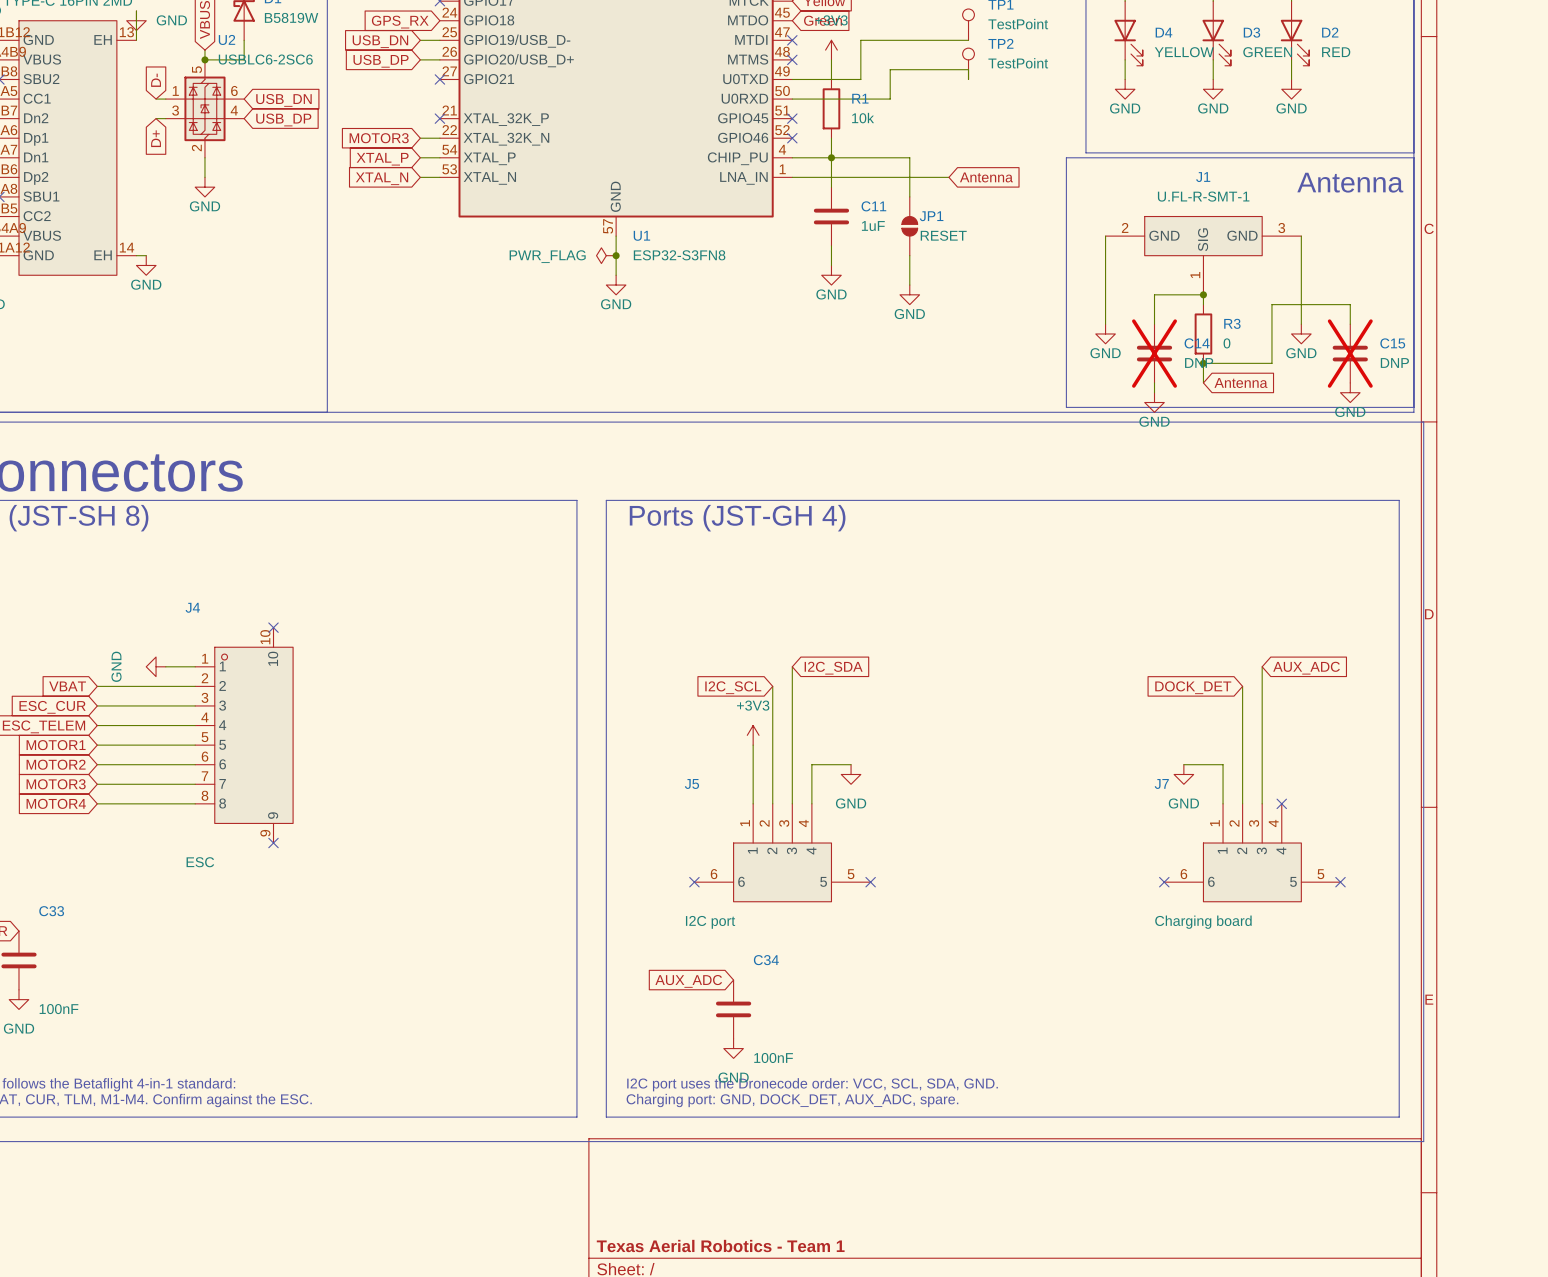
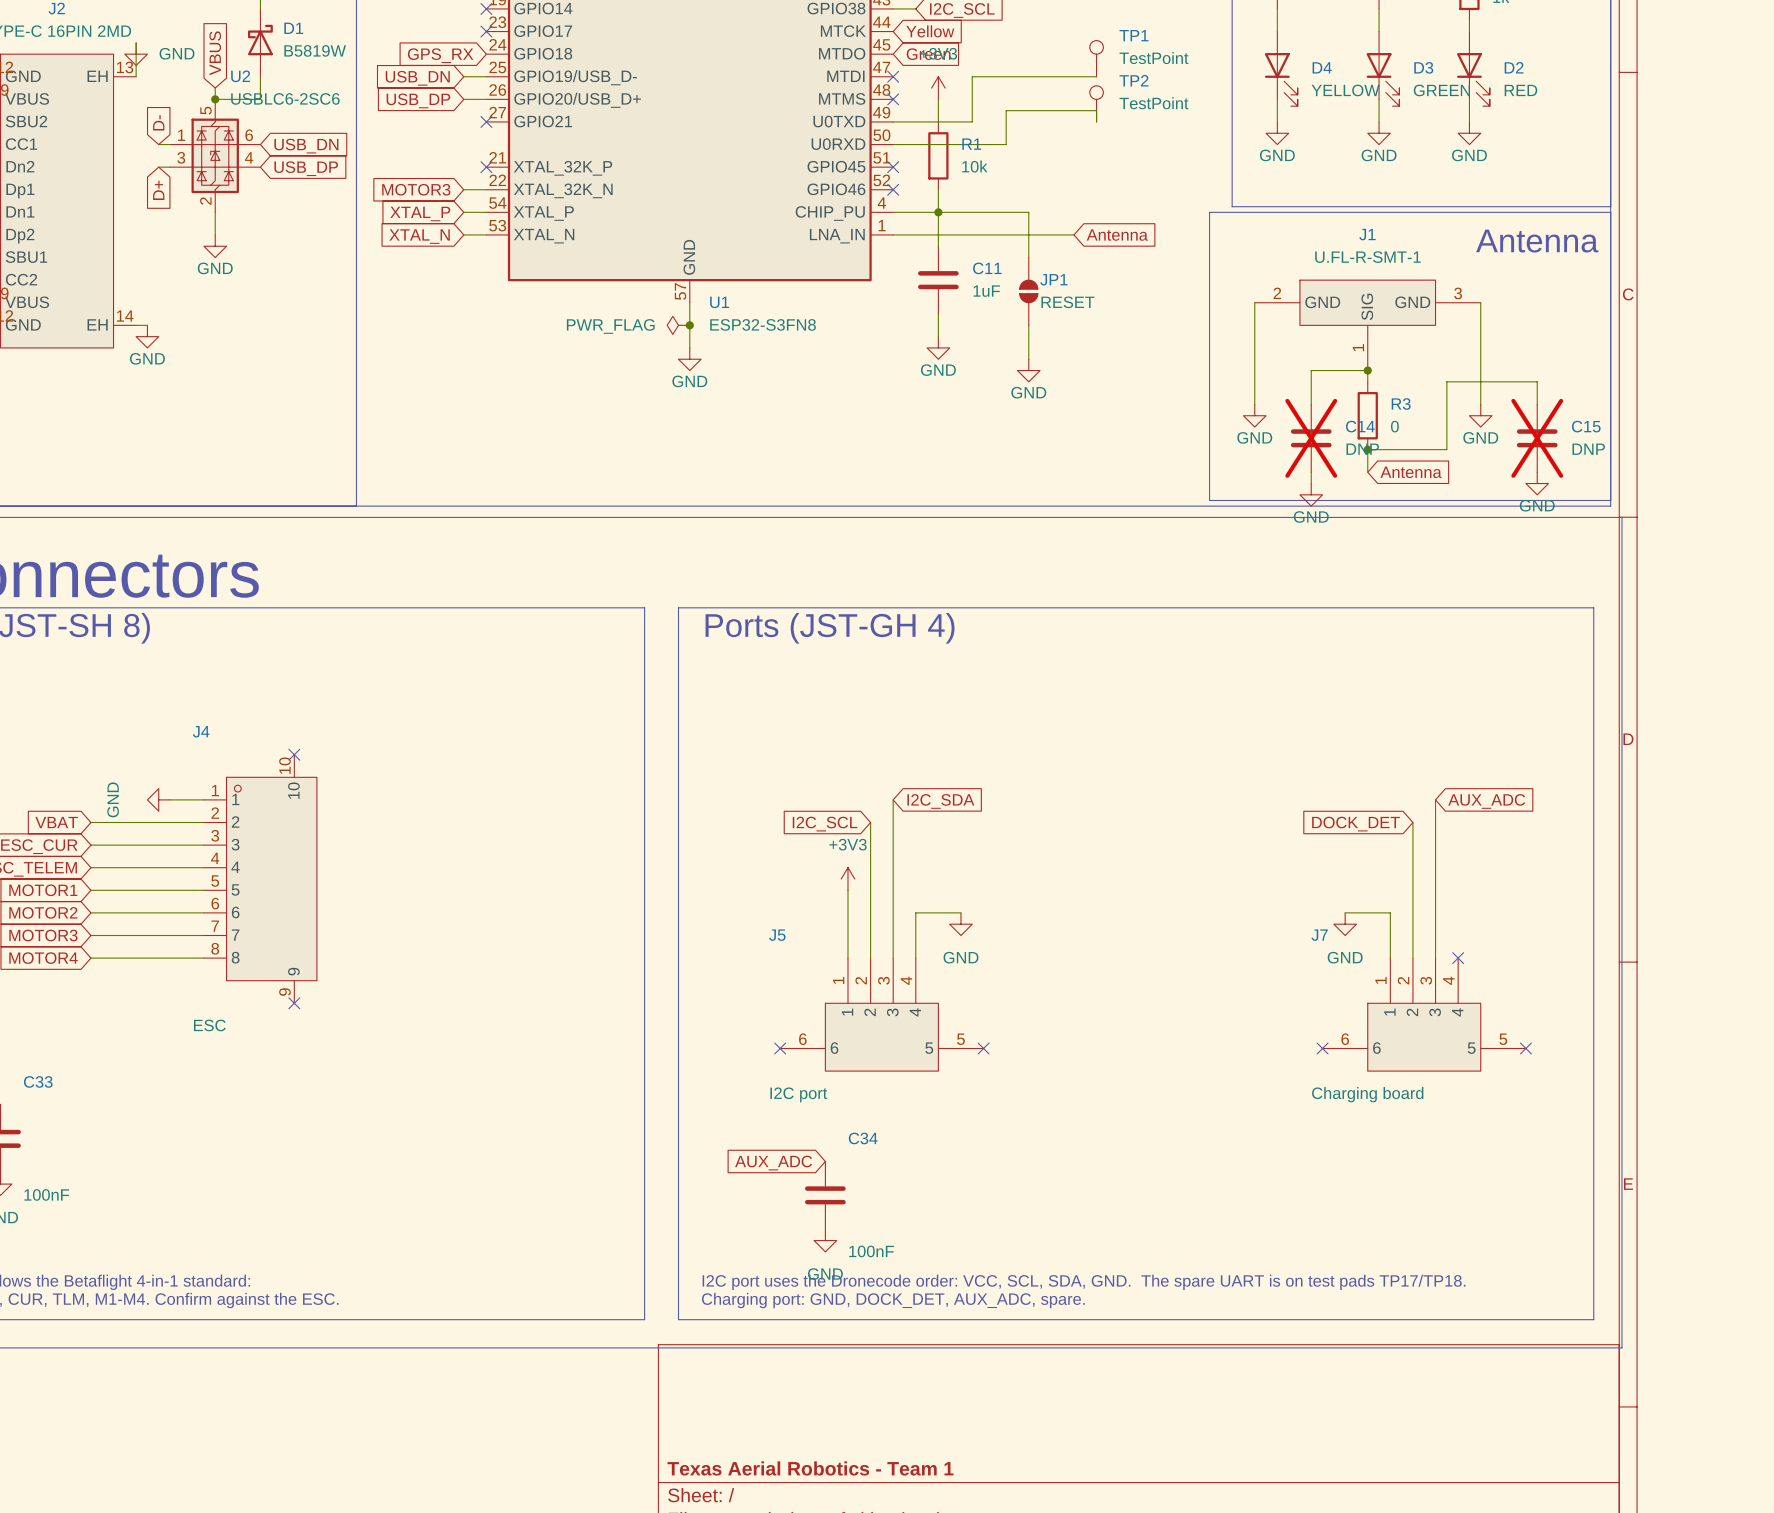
text: I2C port uses the Dronecode order: VCC, SCL, SDA, GND. (812, 1084) -> I2C port uses the Dronecode order: VCC, SCL, SDA, GND. The spare UART is on test pads TP17/TP18. (1084, 1282)

